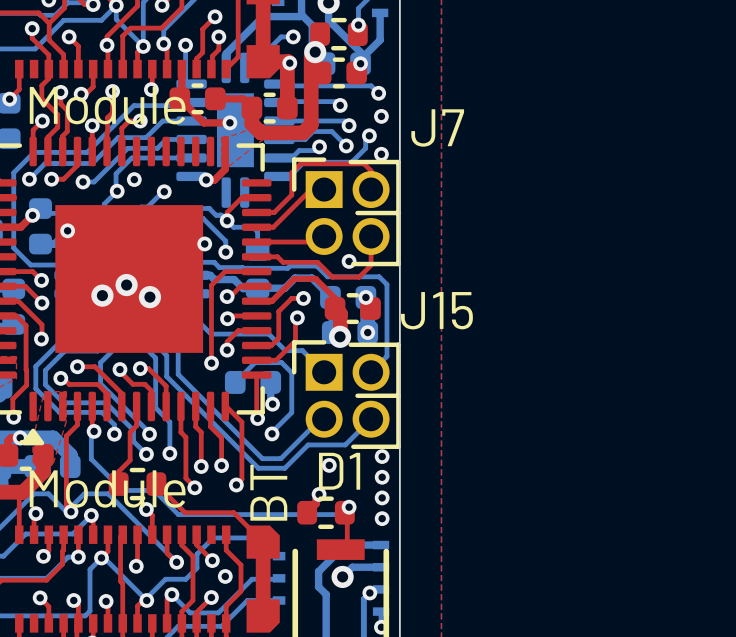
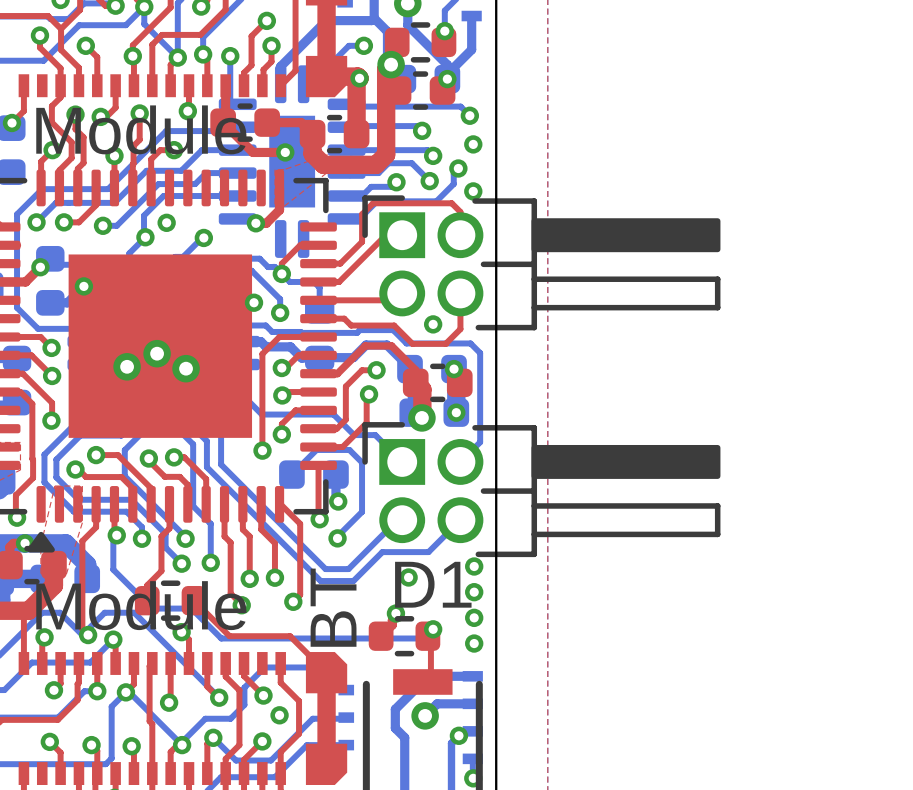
J7: (346, 211) -> none
part: none -> (541, 262)
J15: (346, 394) -> none
part: none -> (541, 489)

